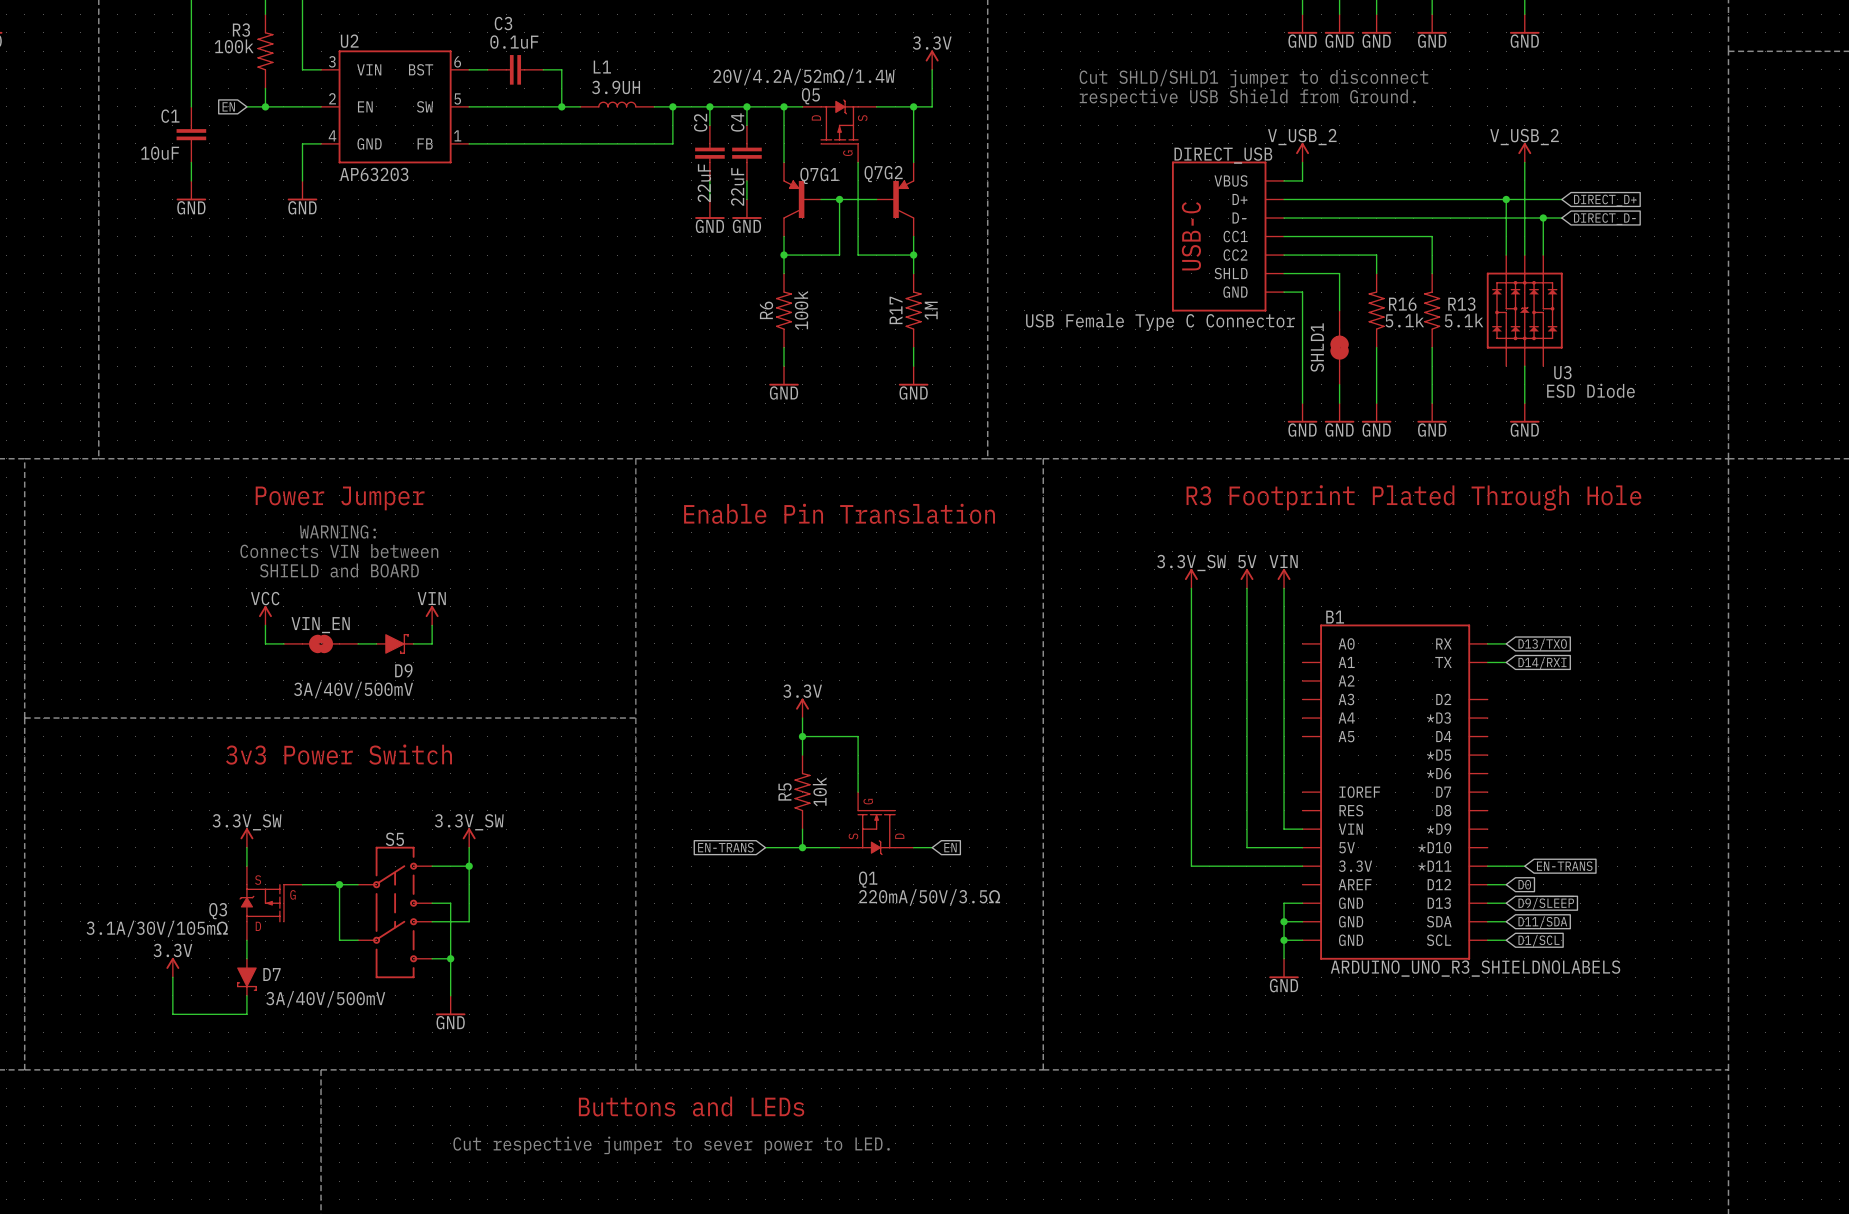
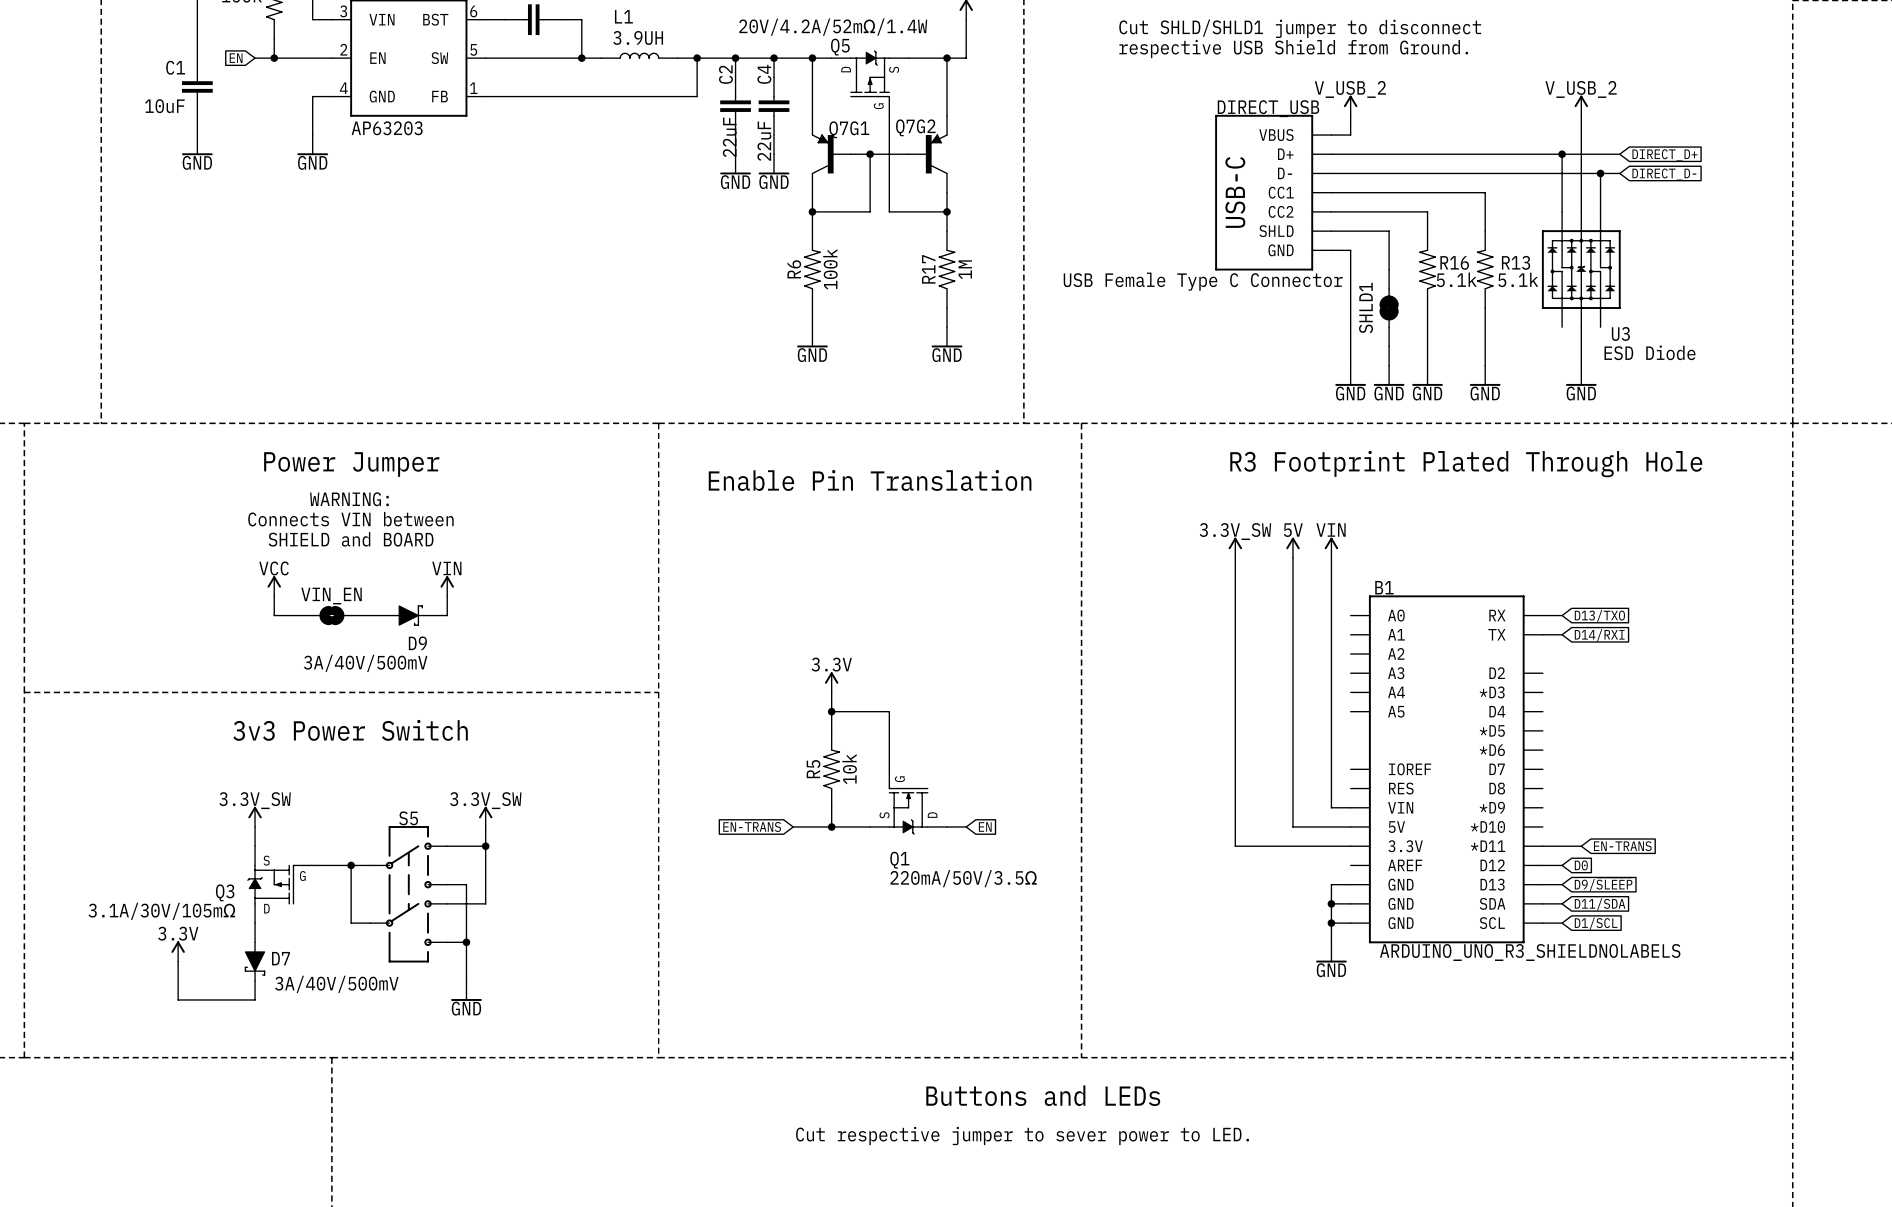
text: Buttons and LEDs (691, 1106) -> none
text: none -> Buttons and LEDs (1043, 1095)
text: Cut respective jumper to sever power to LED. (671, 1145) -> none
text: none -> Cut respective jumper to sever power to LED. (1022, 1135)

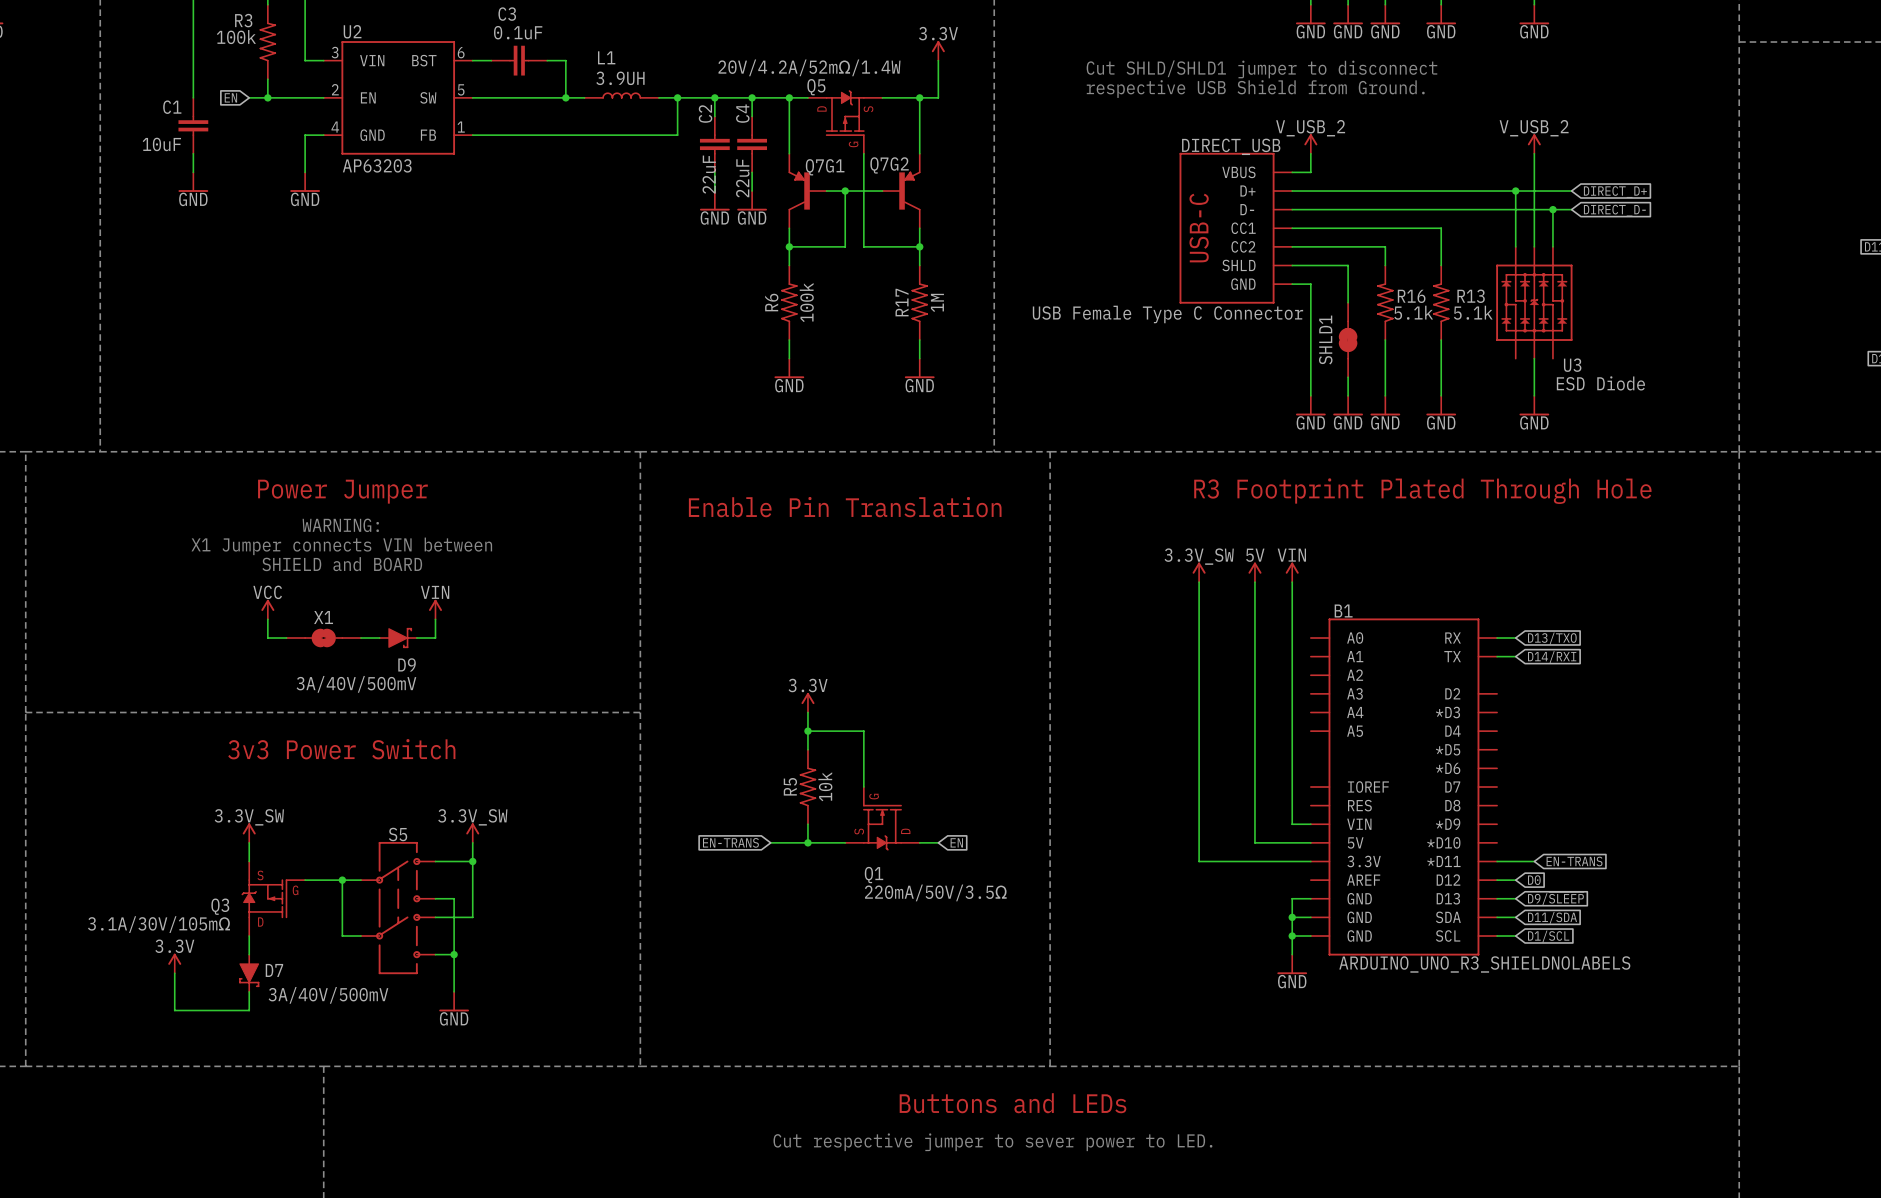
text: Connects VIN between (350, 519) -> X1 Jumper connects VIN between (341, 546)
VIN_EN name: VIN_EN (331, 596) -> X1 (323, 617)

